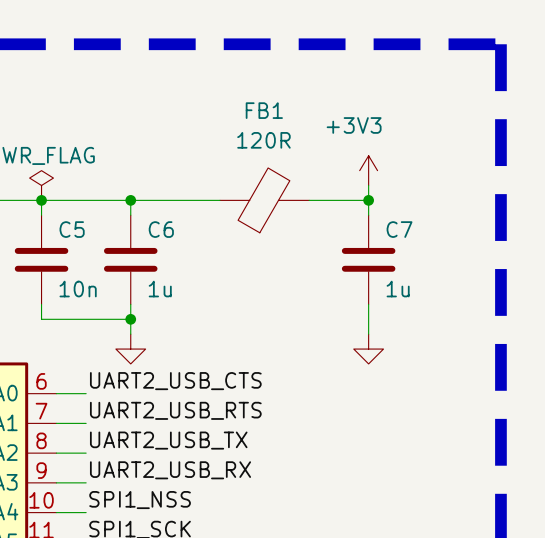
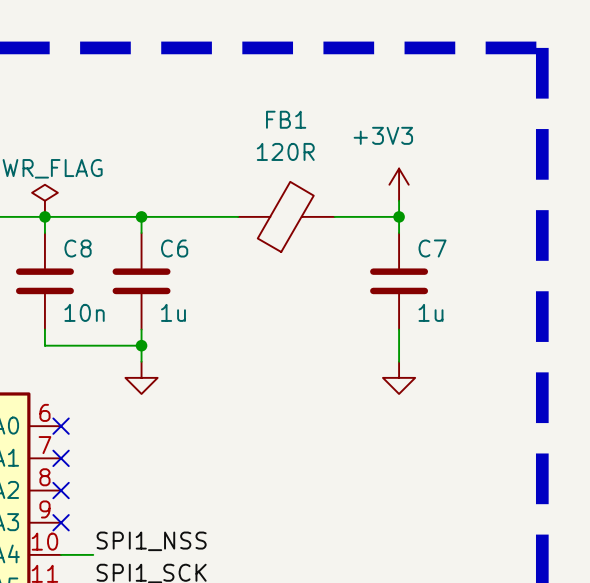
C5 name: C5 (72, 229) -> C8 (78, 248)
label: UART2_USB_CTS (175, 381) -> none
wire: (56, 393) (86, 393) -> none
no-connect mark: none -> (61, 426)
label: UART2_USB_RTS (175, 410) -> none
wire: (56, 423) (86, 423) -> none
no-connect mark: none -> (61, 458)
label: UART2_USB_TX (168, 440) -> none
wire: (56, 453) (86, 453) -> none
no-connect mark: none -> (61, 490)
label: UART2_USB_RX (170, 470) -> none
wire: (56, 482) (86, 482) -> none
no-connect mark: none -> (61, 522)

